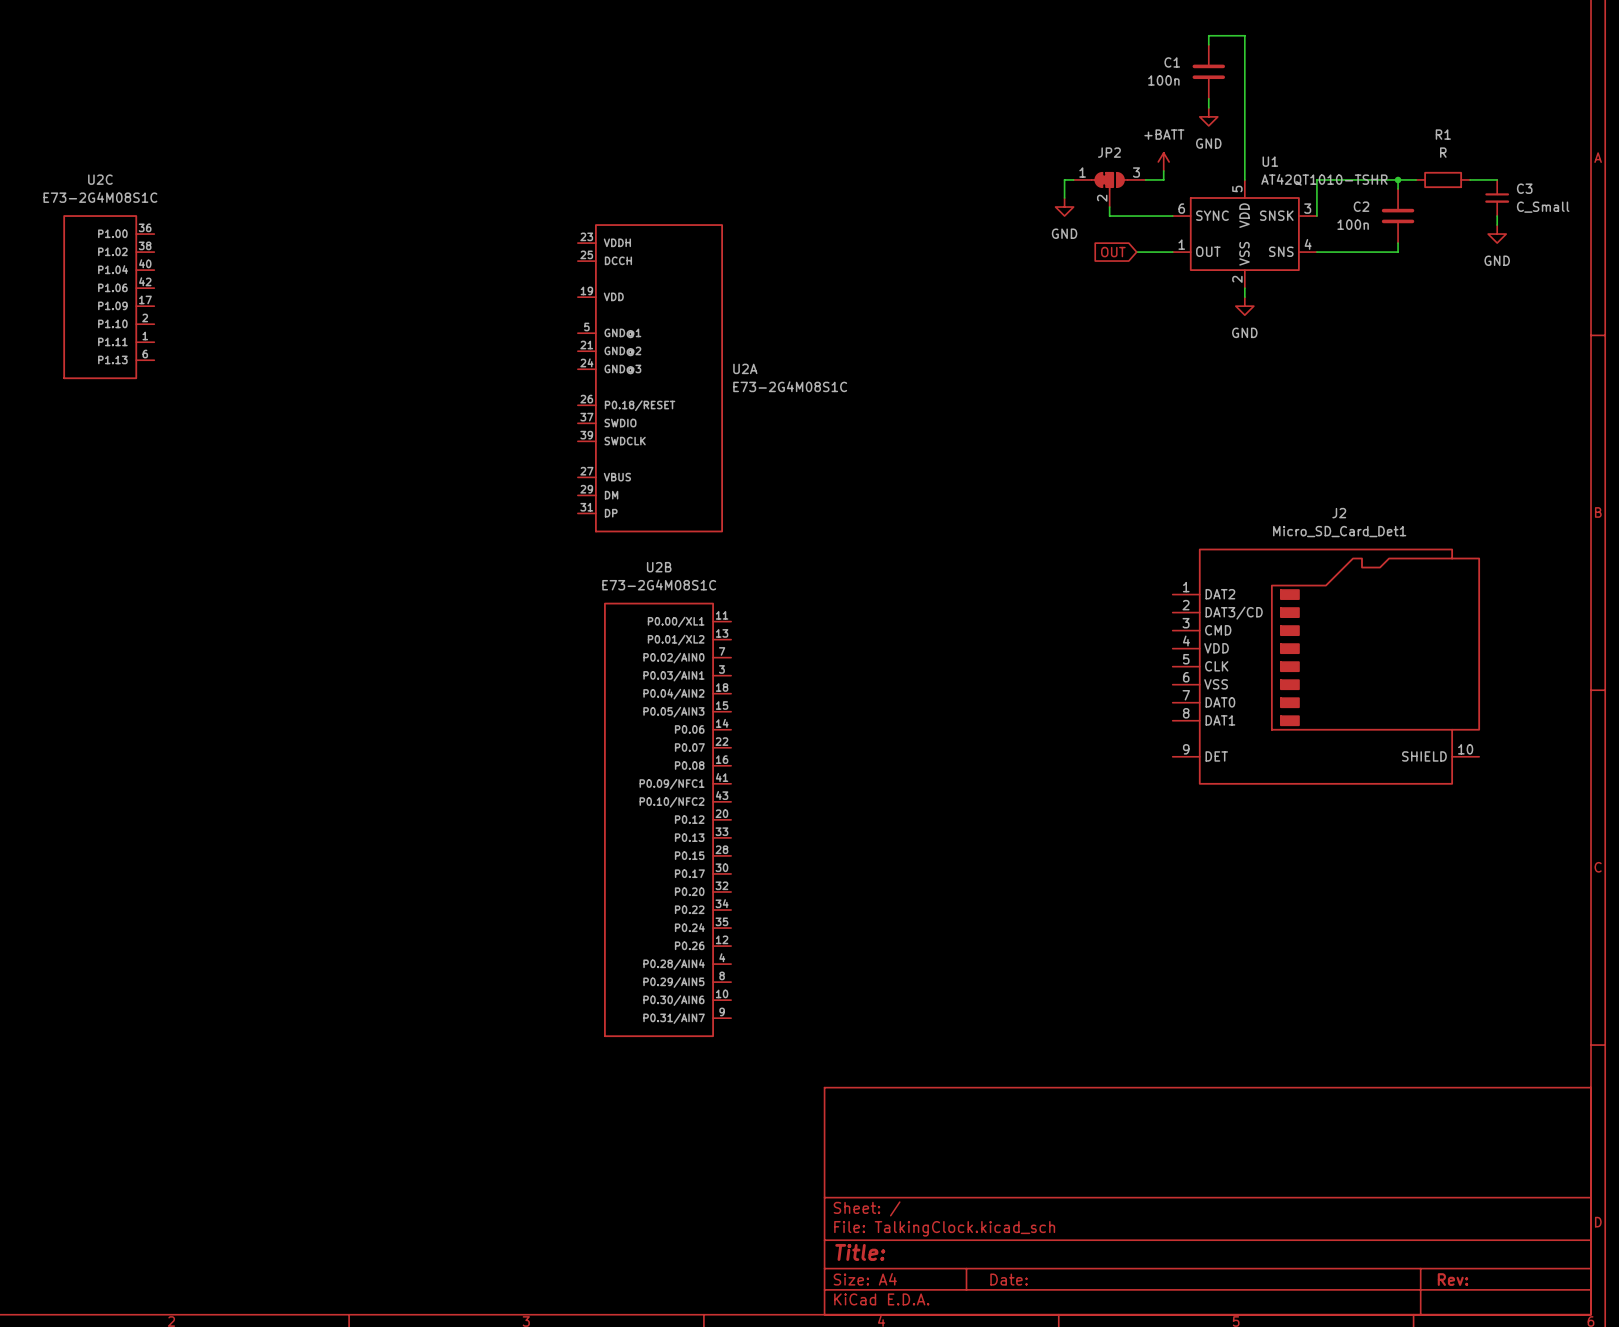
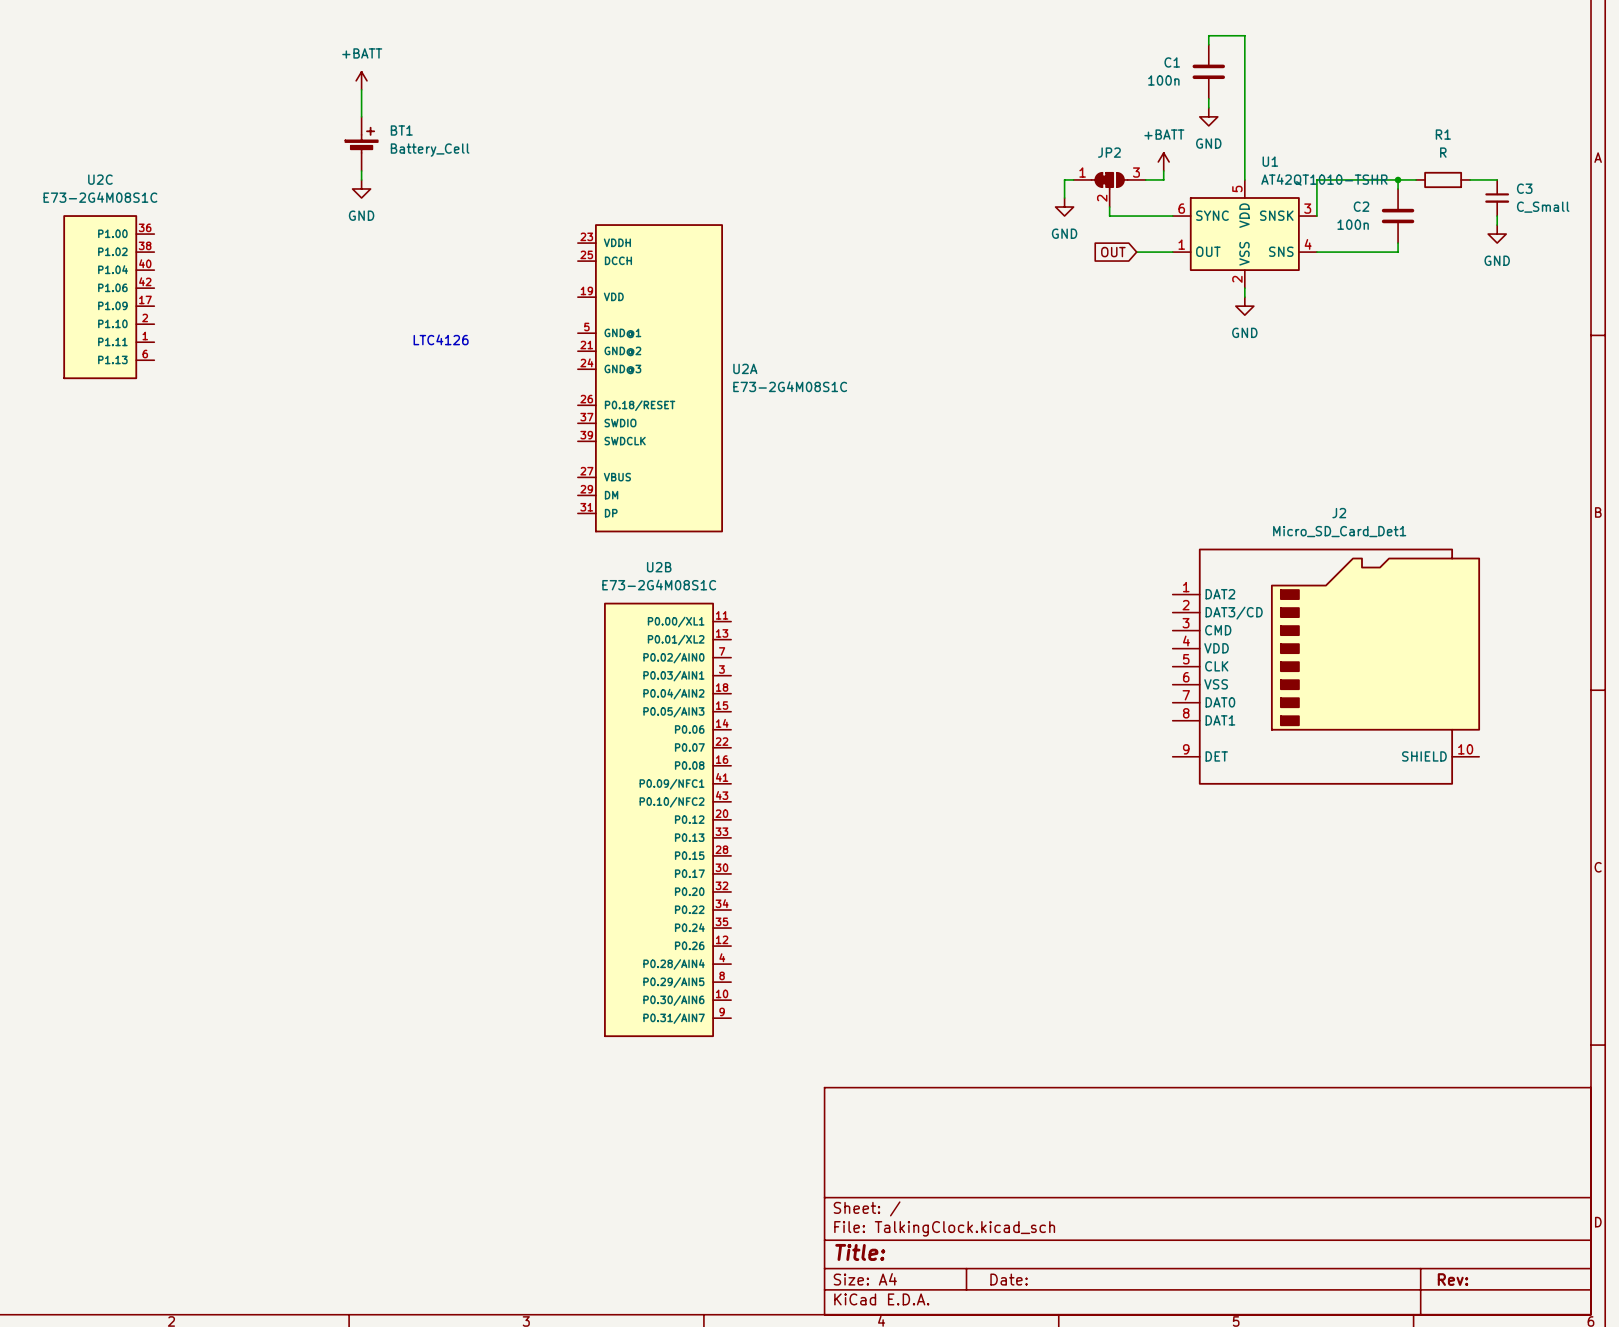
power symbol: none -> +BATT (361, 80)
wire: none -> (361, 89) (361, 116)
BT1: none -> Battery_Cell (361, 143)
wire: none -> (361, 170) (361, 179)
power symbol: none -> GND (361, 188)
text: none -> LTC4126 (441, 339)

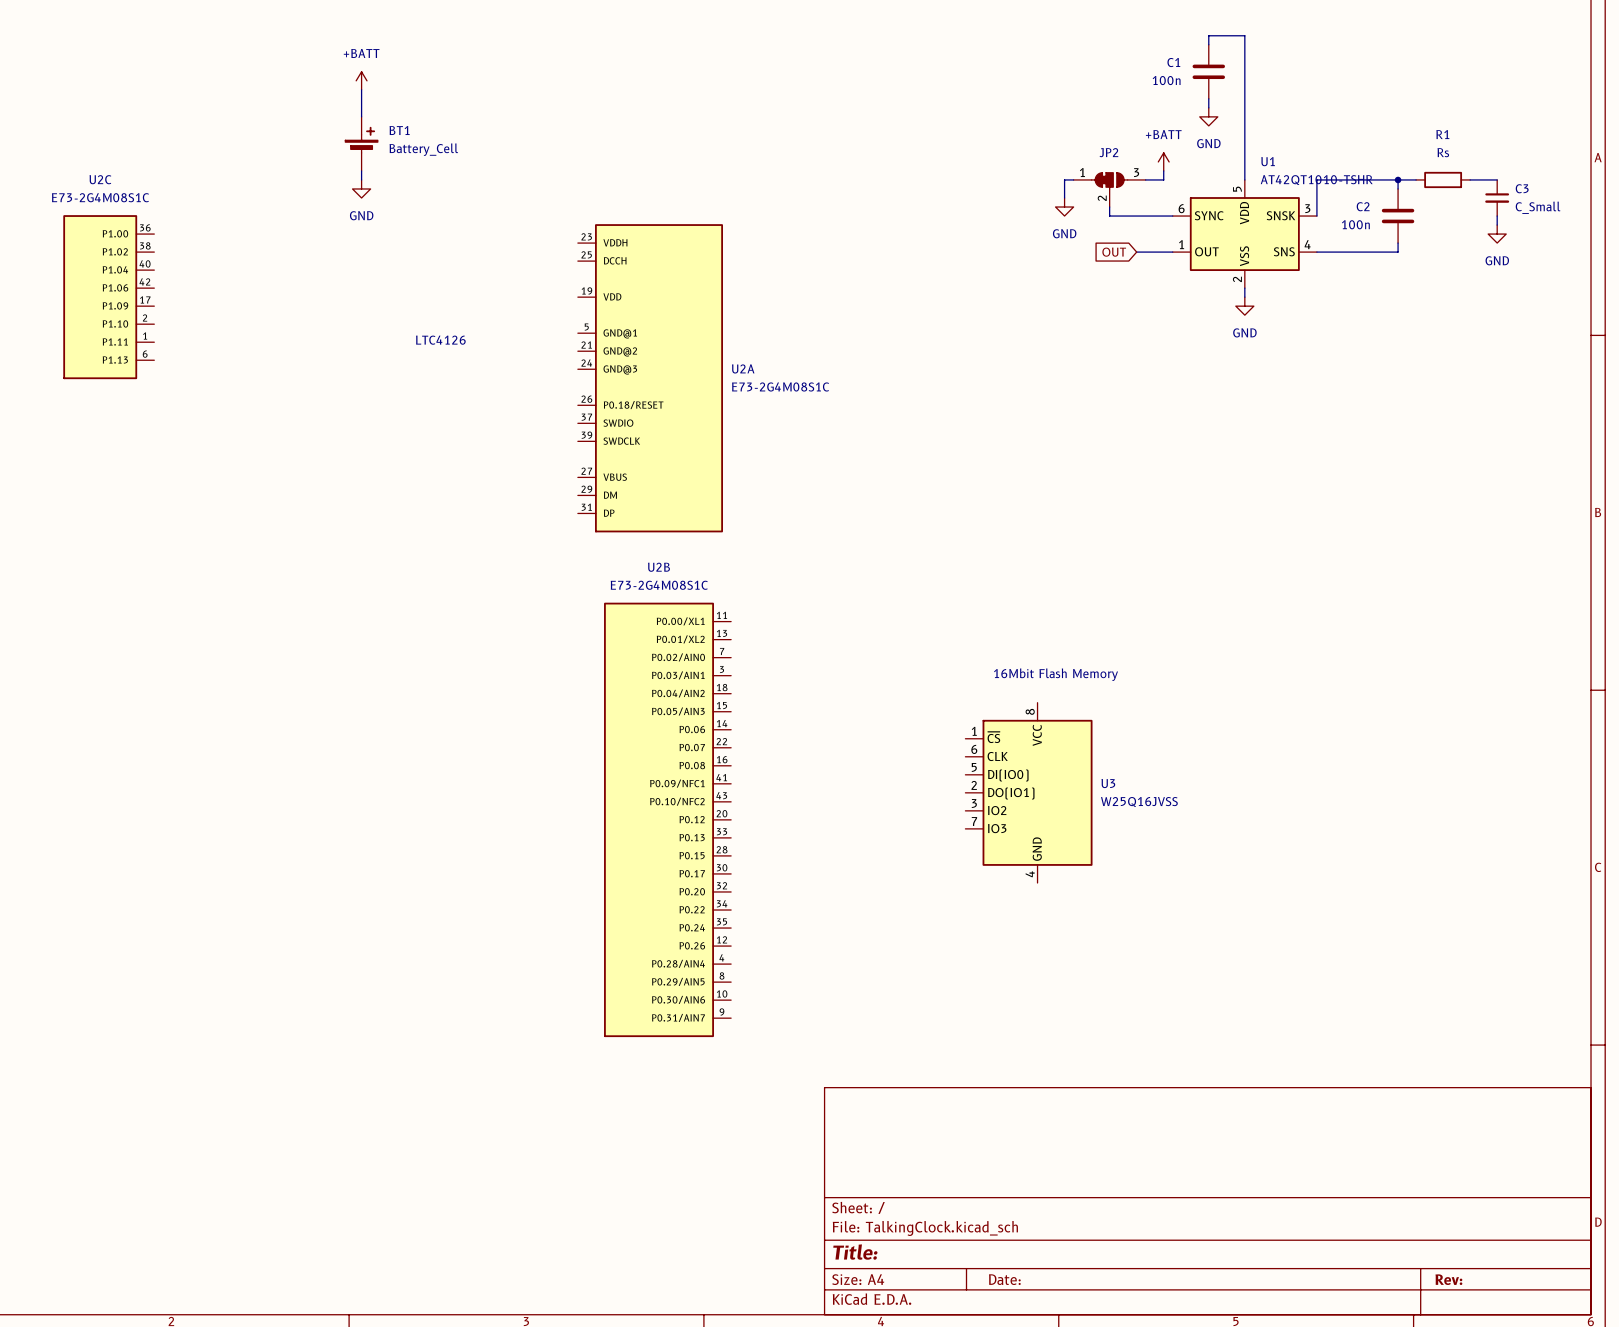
R1 value: R (1443, 152) -> Rs (1443, 152)
J2: Micro_SD_Card_Det1 (1326, 666) -> none
text: none -> 16Mbit Flash Memory (1056, 674)
U3: none -> W25Q16JVSS (1028, 792)

